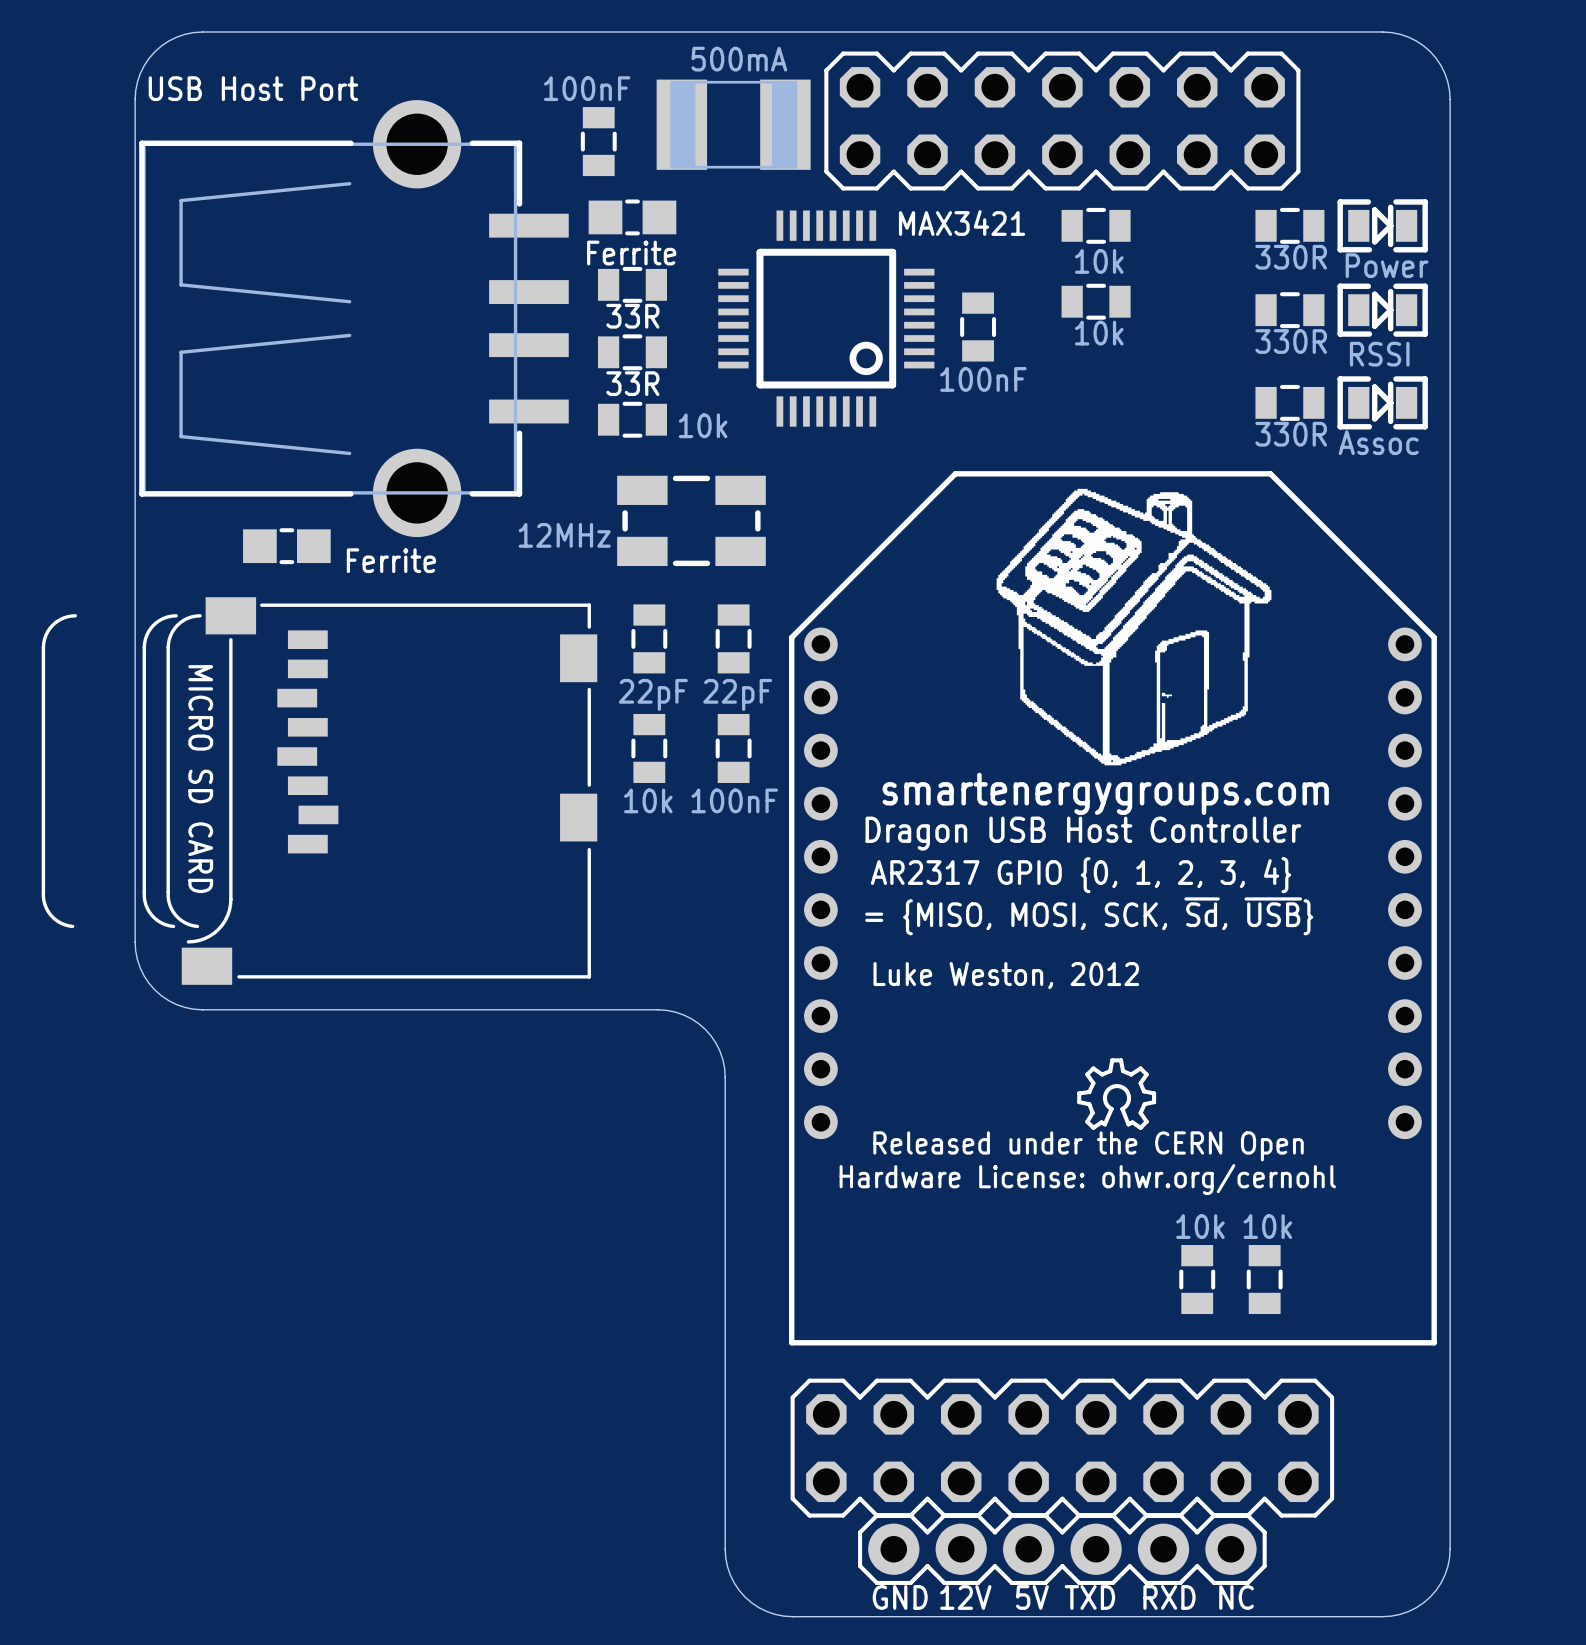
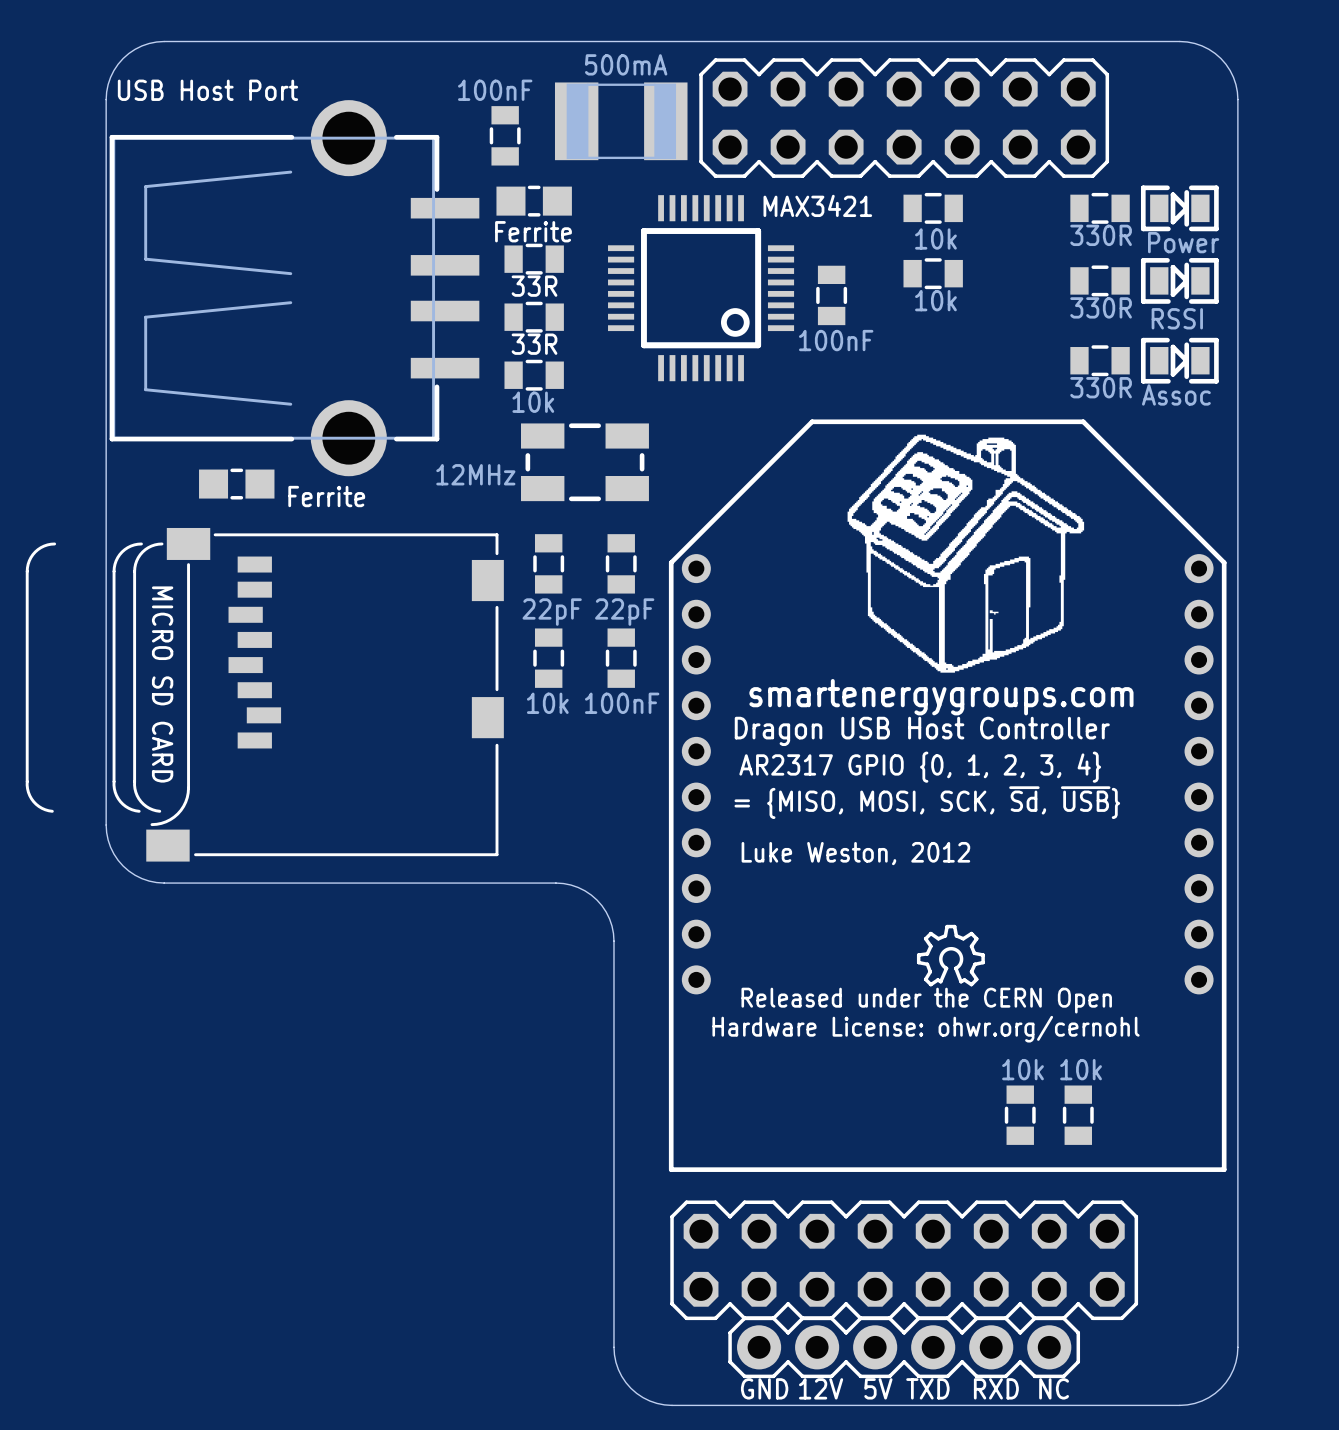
part value position: 10k (703, 425) -> 10k (533, 402)

